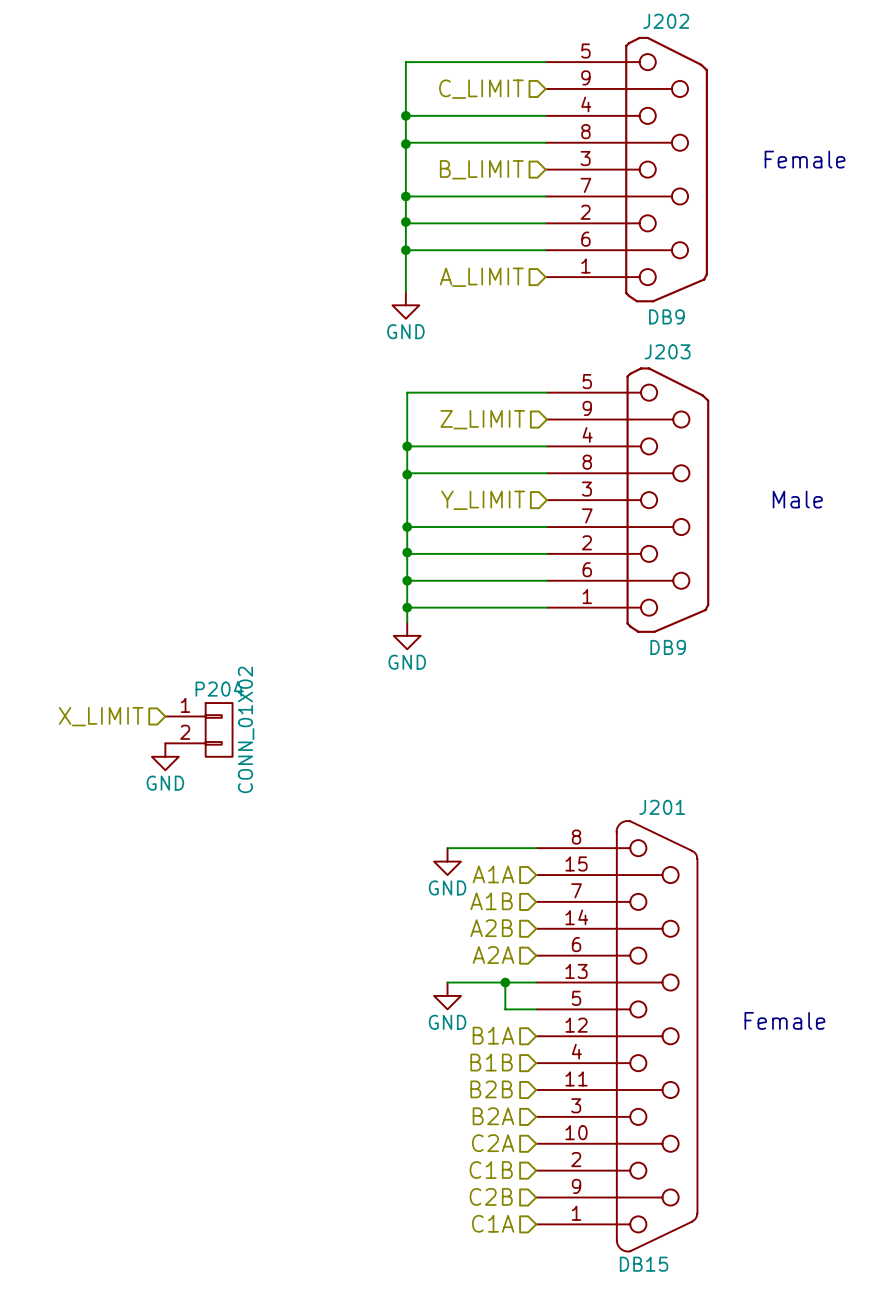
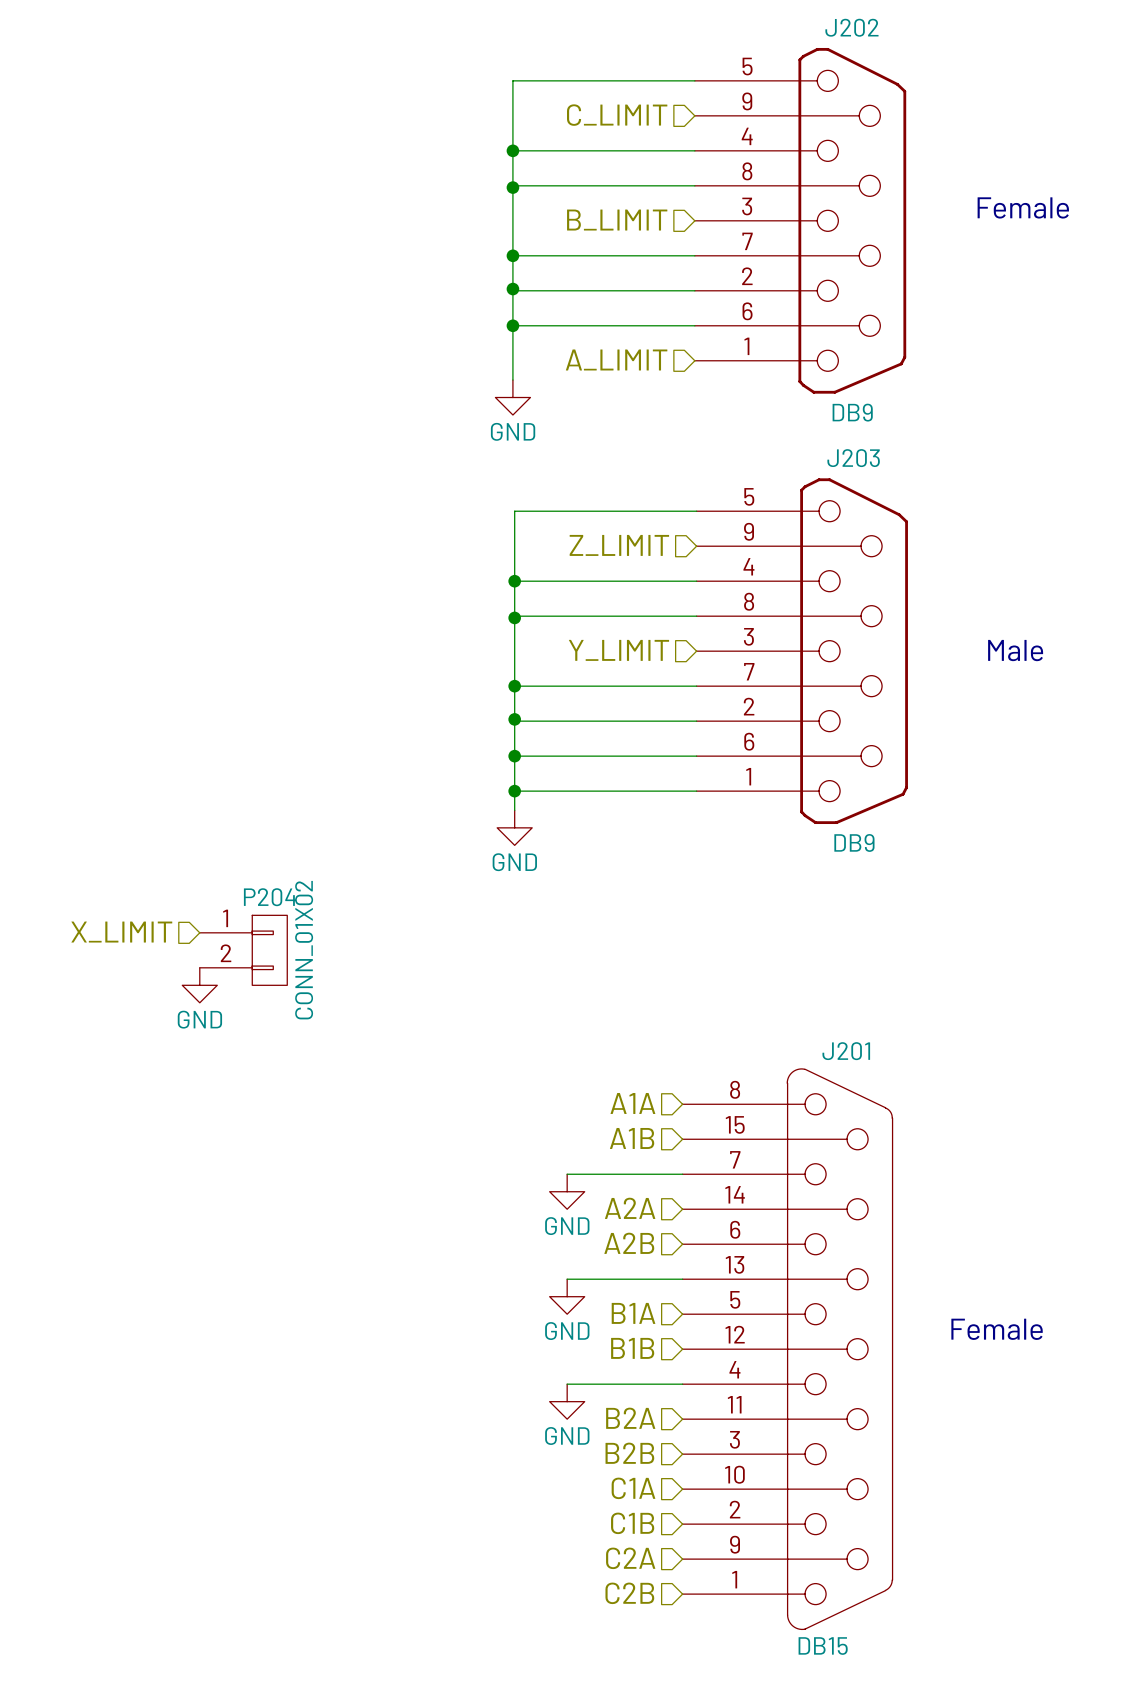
hierarchical label: none -> A1A (632, 1103)
wire: (447, 848) (536, 848) -> (567, 1174) (682, 1174)
power symbol position: GND (447, 861) -> GND (567, 1191)
hierarchical label: A1A (493, 874) -> A1B (632, 1138)
hierarchical label: A1B (491, 901) -> none
hierarchical label: A2B (491, 928) -> A2A (630, 1208)
hierarchical label: A2A (493, 955) -> A2B (629, 1243)
wire: (505, 982) (505, 1009) (536, 1009) -> none
junction: (505, 982) -> none
hierarchical label: none -> B1A (633, 1313)
hierarchical label: B1A (493, 1035) -> B1B (632, 1348)
hierarchical label: B1B (491, 1062) -> none
wire: none -> (567, 1384) (682, 1384)
power symbol: none -> GND (567, 1401)
hierarchical label: B2B (491, 1089) -> B2A (630, 1418)
hierarchical label: B2A (493, 1116) -> B2B (629, 1453)
hierarchical label: C2A (493, 1143) -> C1A (633, 1488)
hierarchical label: C2B (491, 1196) -> C2A (630, 1558)
hierarchical label: C1A (493, 1223) -> C2B (629, 1593)

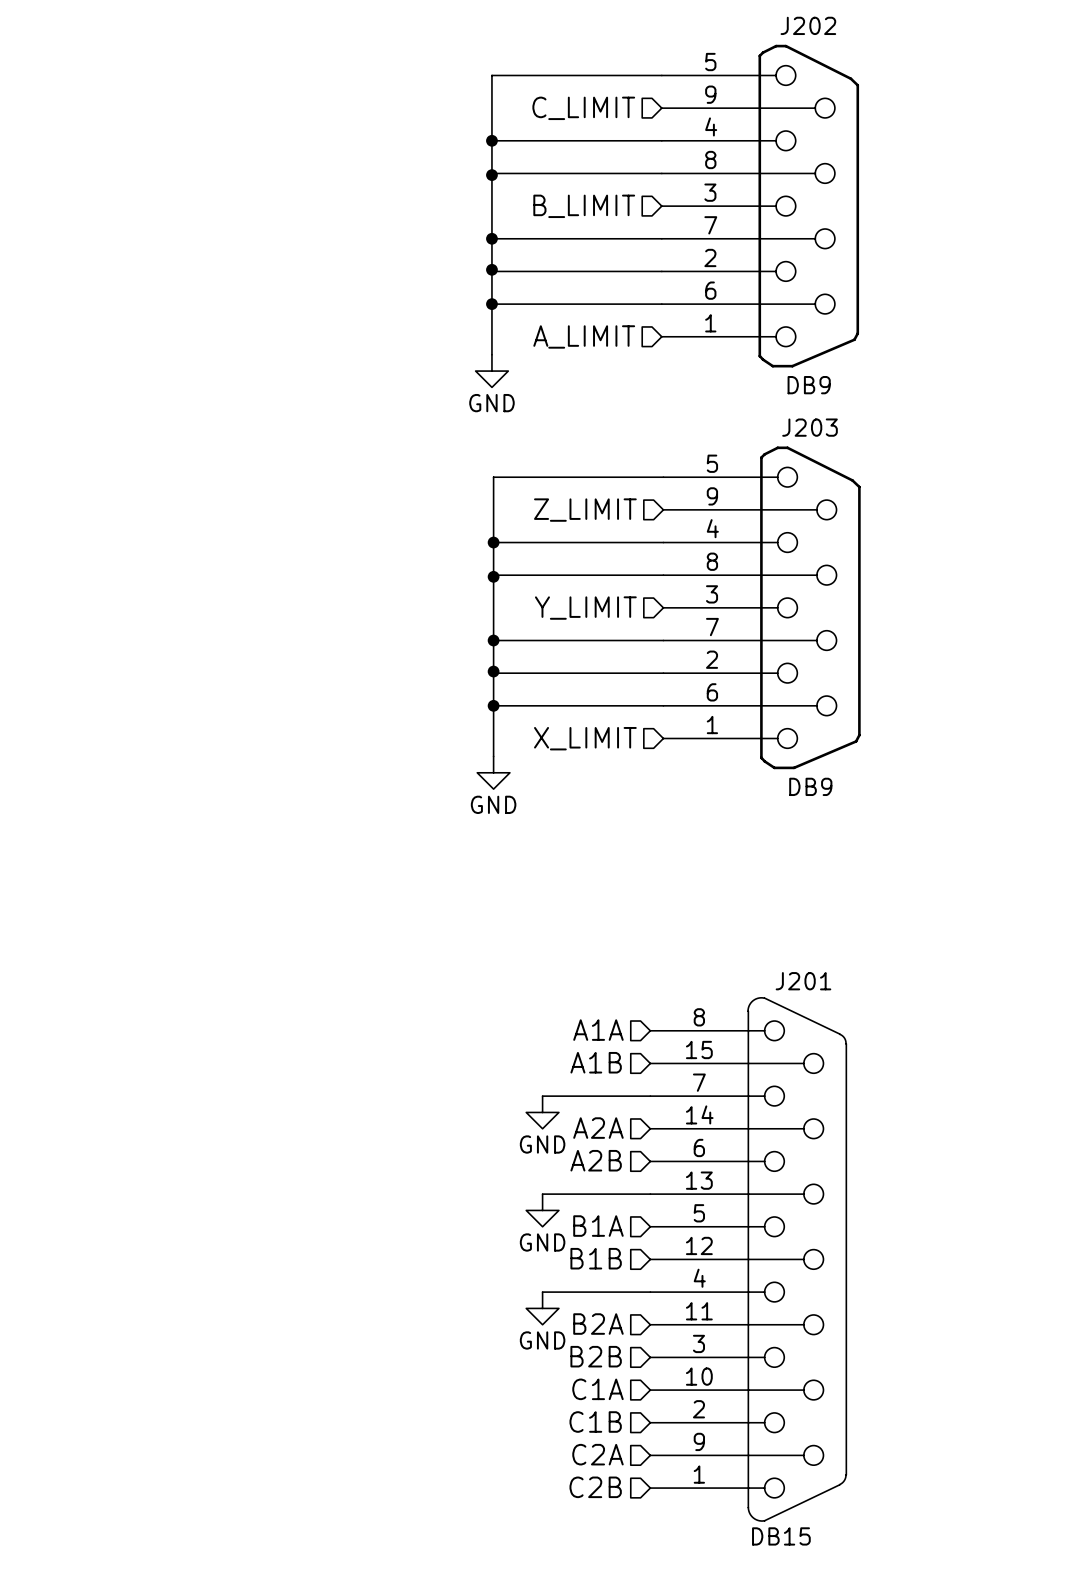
text: Female (1023, 207) -> none
text: Male (1015, 650) -> none
hierarchical label: none -> X_LIMIT (585, 738)
wire: (514, 791) (696, 791) -> none
junction: (514, 791) -> none
hierarchical label: X_LIMIT (121, 932) -> none
P204: CONN_01X02 (243, 950) -> none
power symbol: GND (199, 985) -> none
text: Female (997, 1329) -> none

